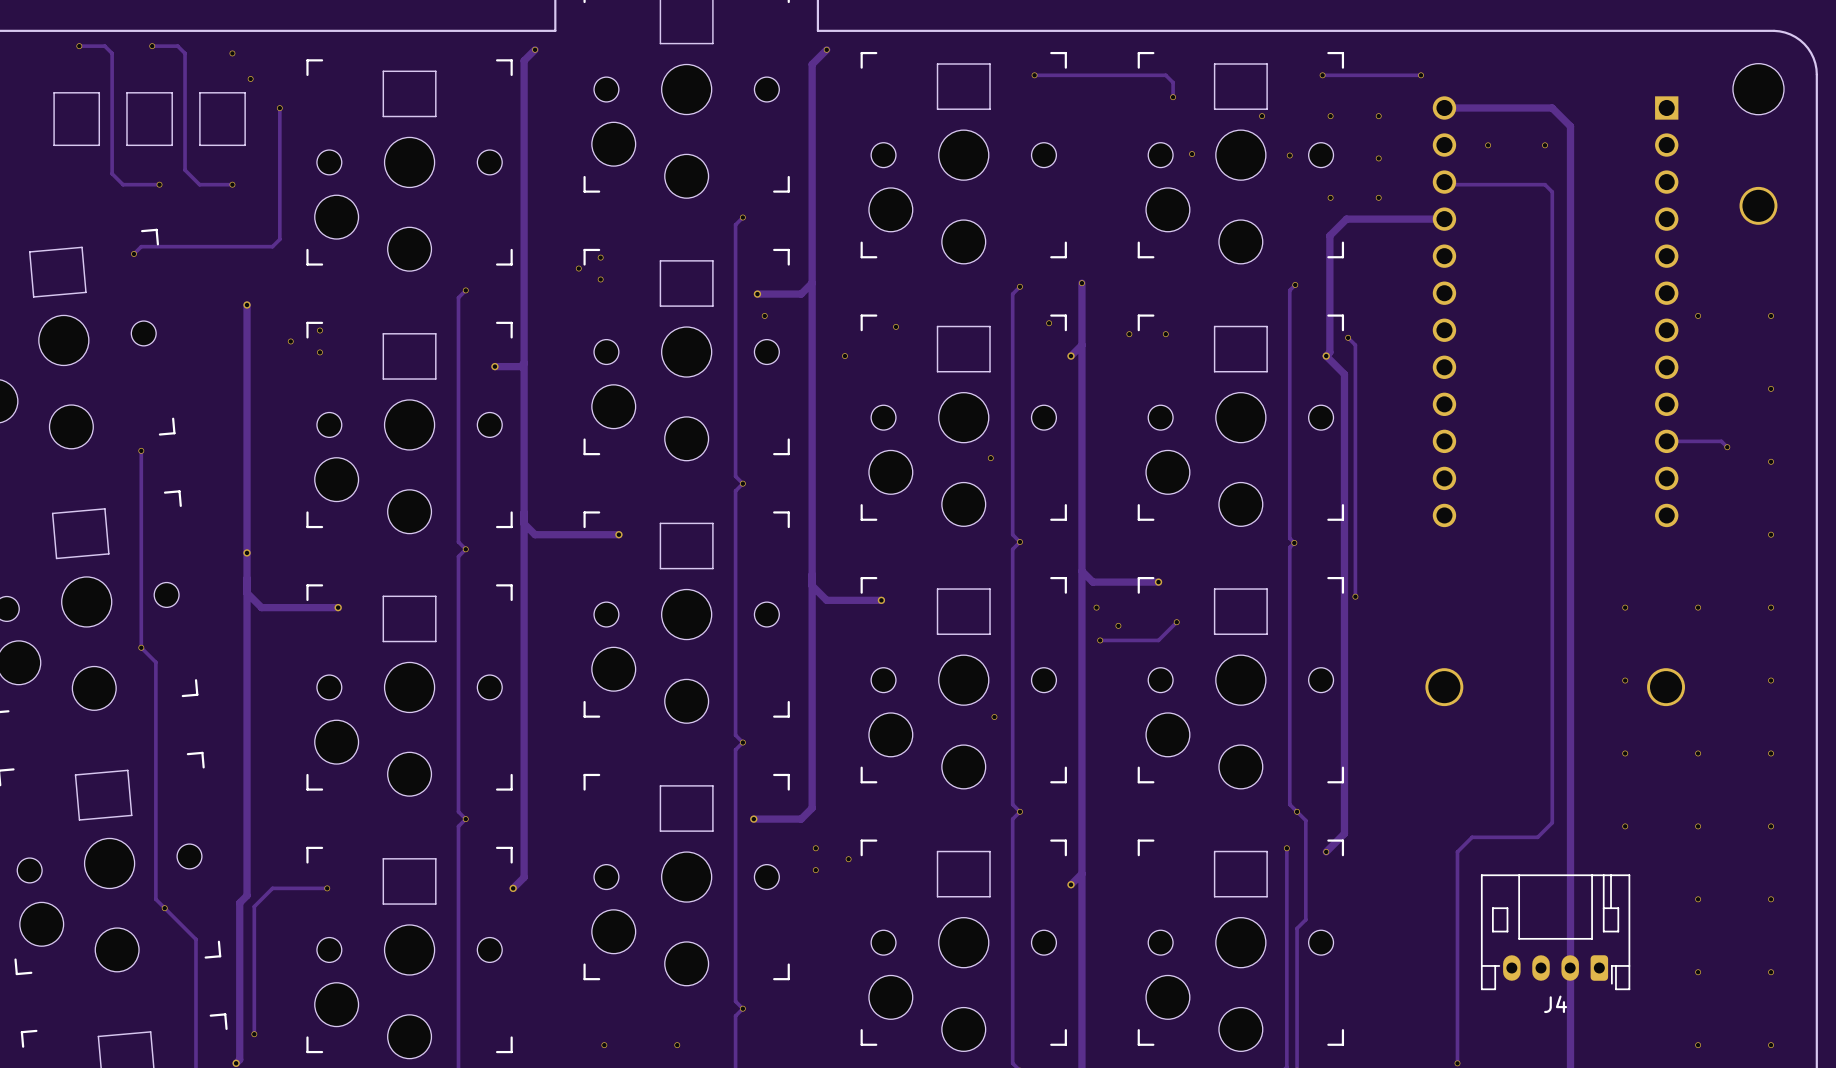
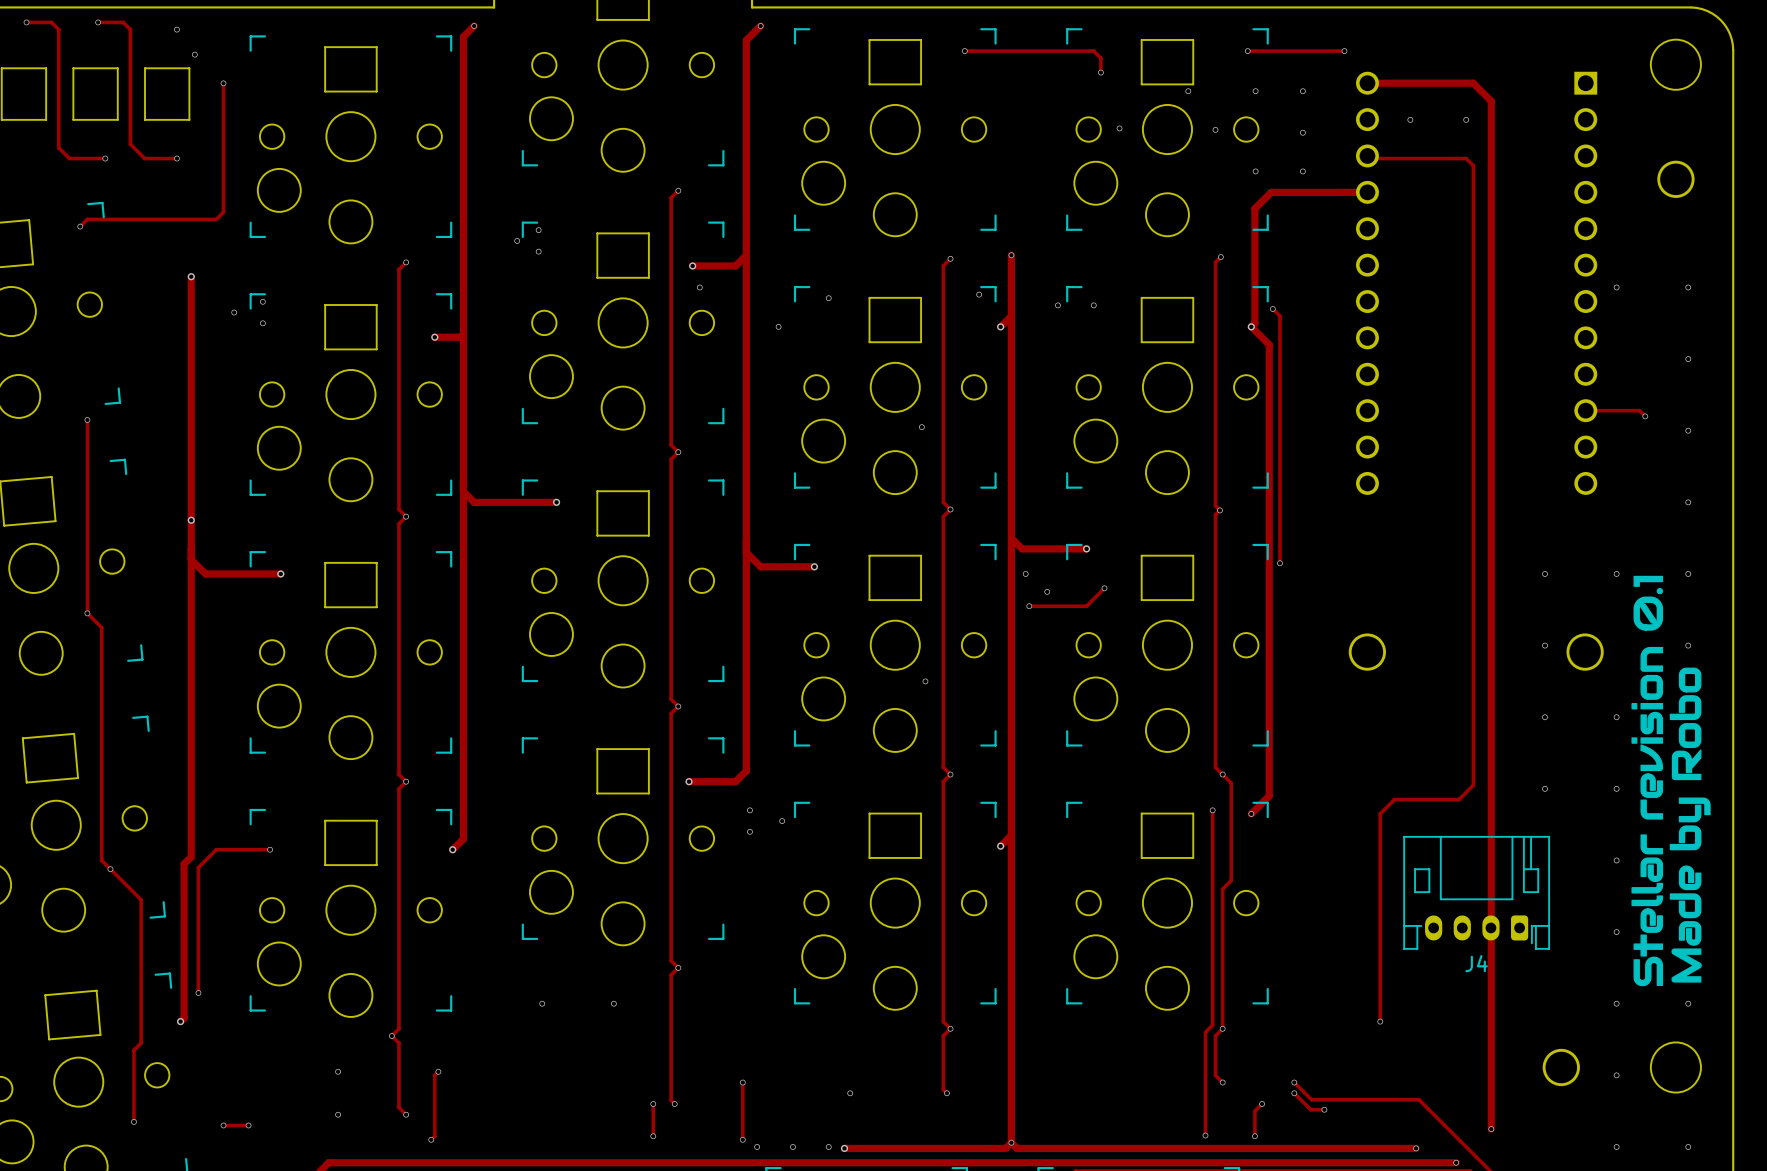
drawing: none -> [1631, 575, 1711, 987]
via: (1771, 753) -> none
via: (1771, 826) -> none
via: (1771, 899) -> none
via: (1771, 972) -> none

